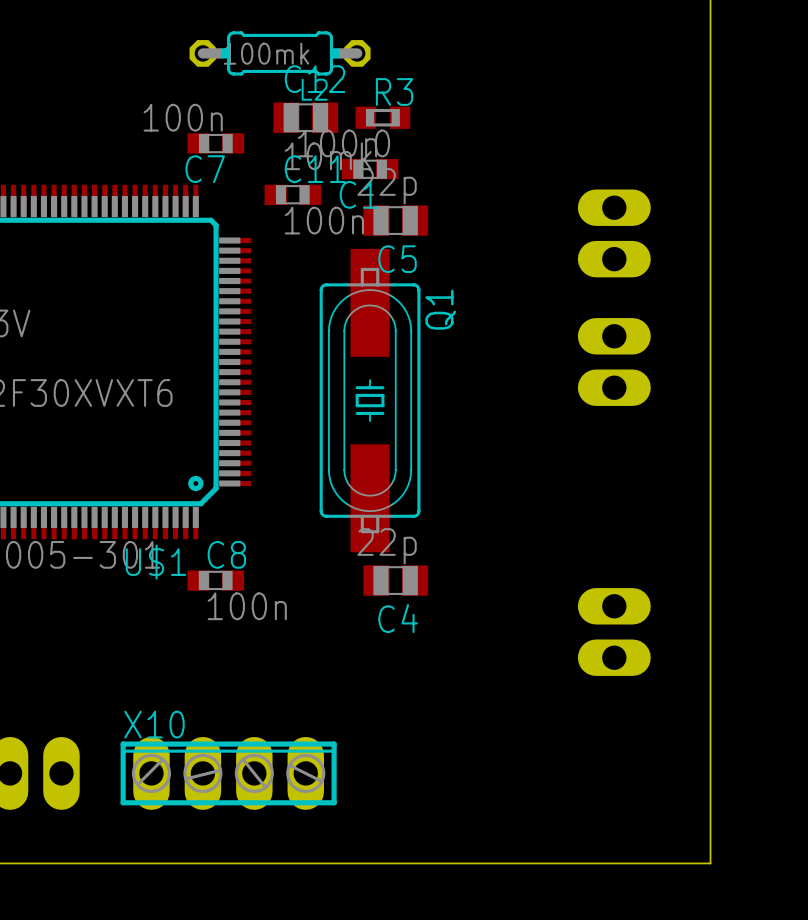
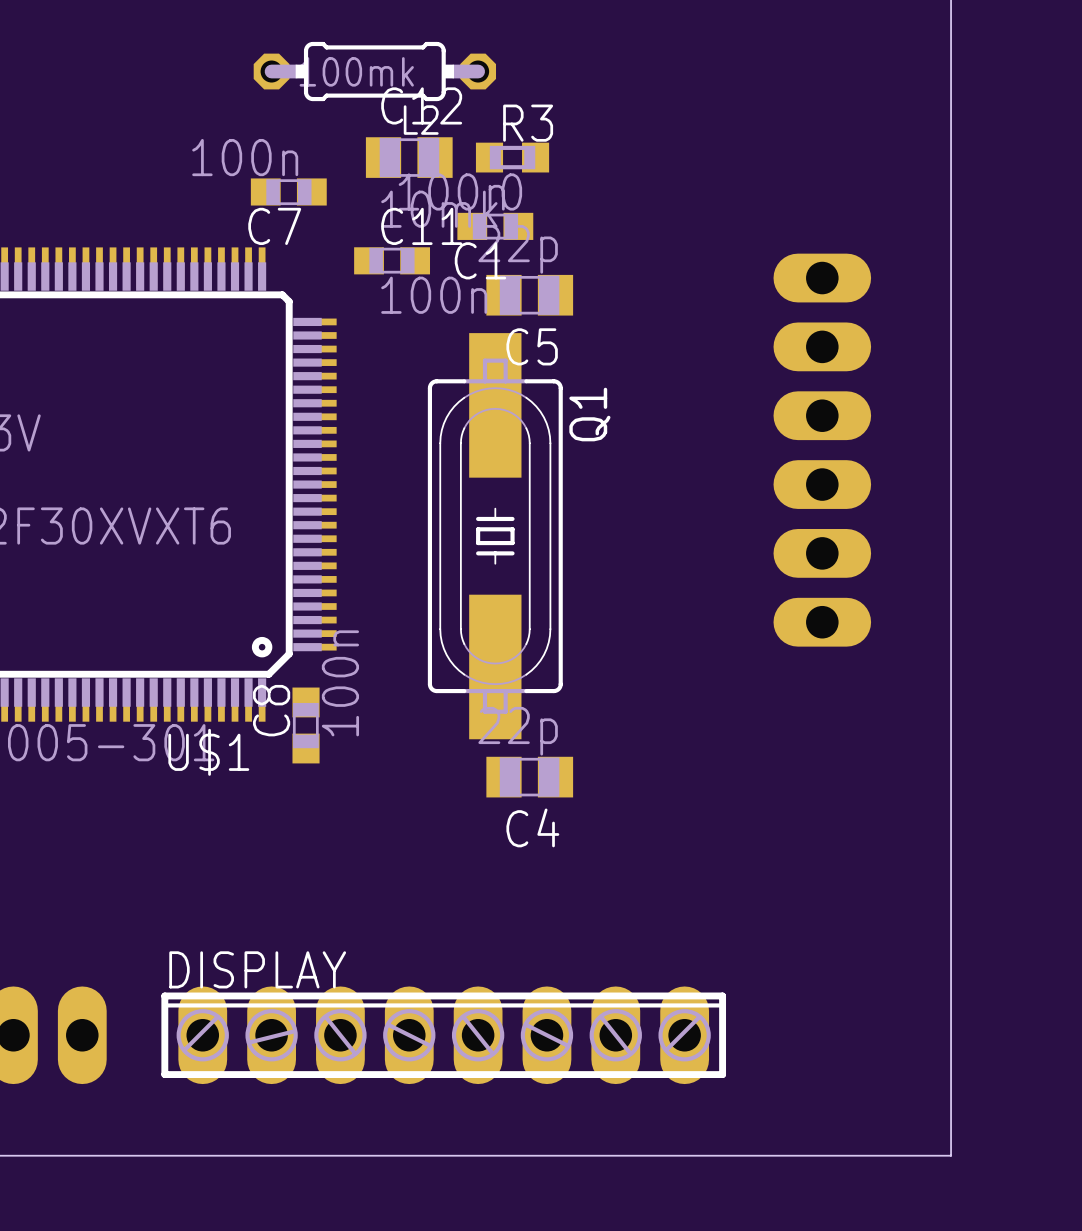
part: none -> (822, 450)
part: (614, 362) -> none
C8 name position: C8 (226, 554) -> C8 (271, 710)
C8 rotation: 0° (215, 580) -> 90° clockwise (306, 725)
C8 position: (215, 580) -> (306, 725)
C8 value position: 100n (247, 606) -> 100n (340, 683)
part: (614, 632) -> none
X10: (228, 773) -> none
DISPLAY: none -> (443, 1035)

